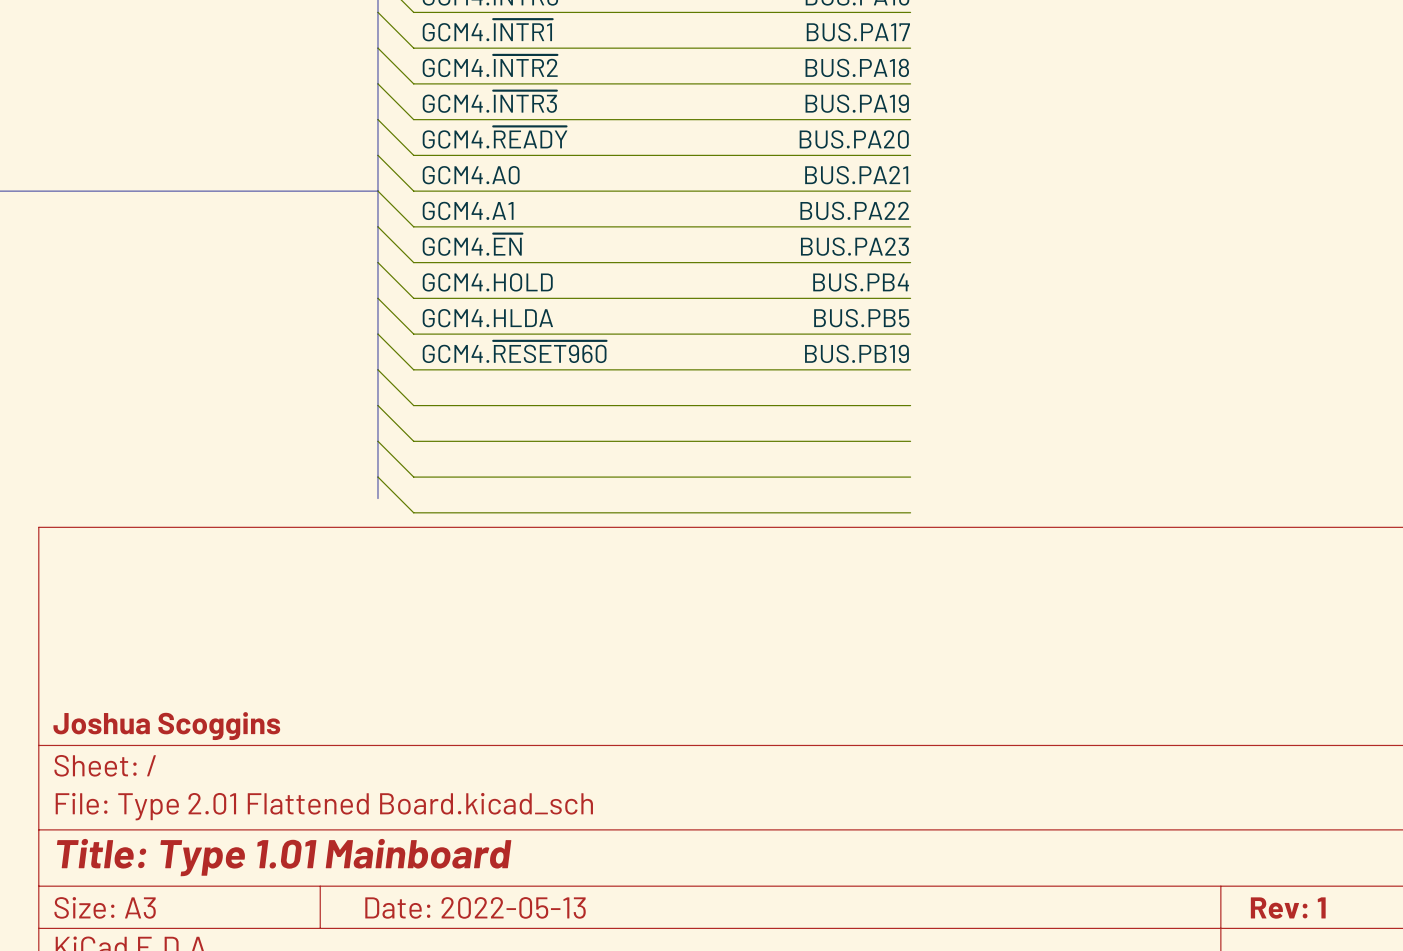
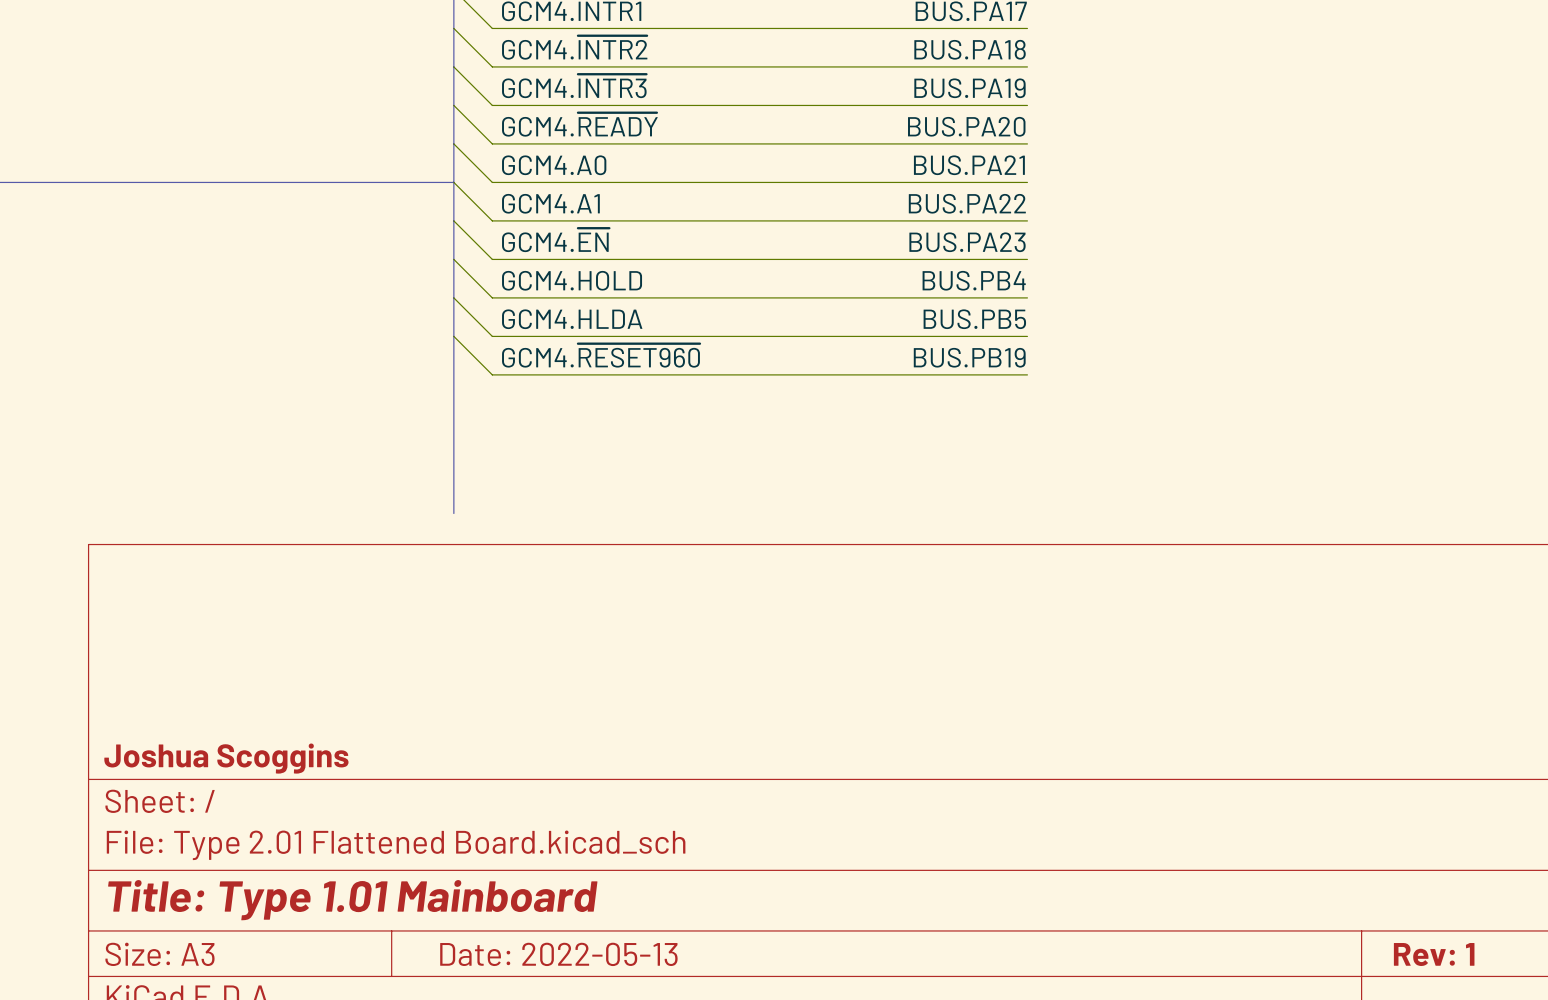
wire: (377, 369) (413, 405) (910, 405) -> none
wire: (377, 405) (413, 441) (910, 441) -> none
wire: (377, 441) (413, 477) (910, 477) -> none
wire: (377, 477) (413, 512) (910, 512) -> none

